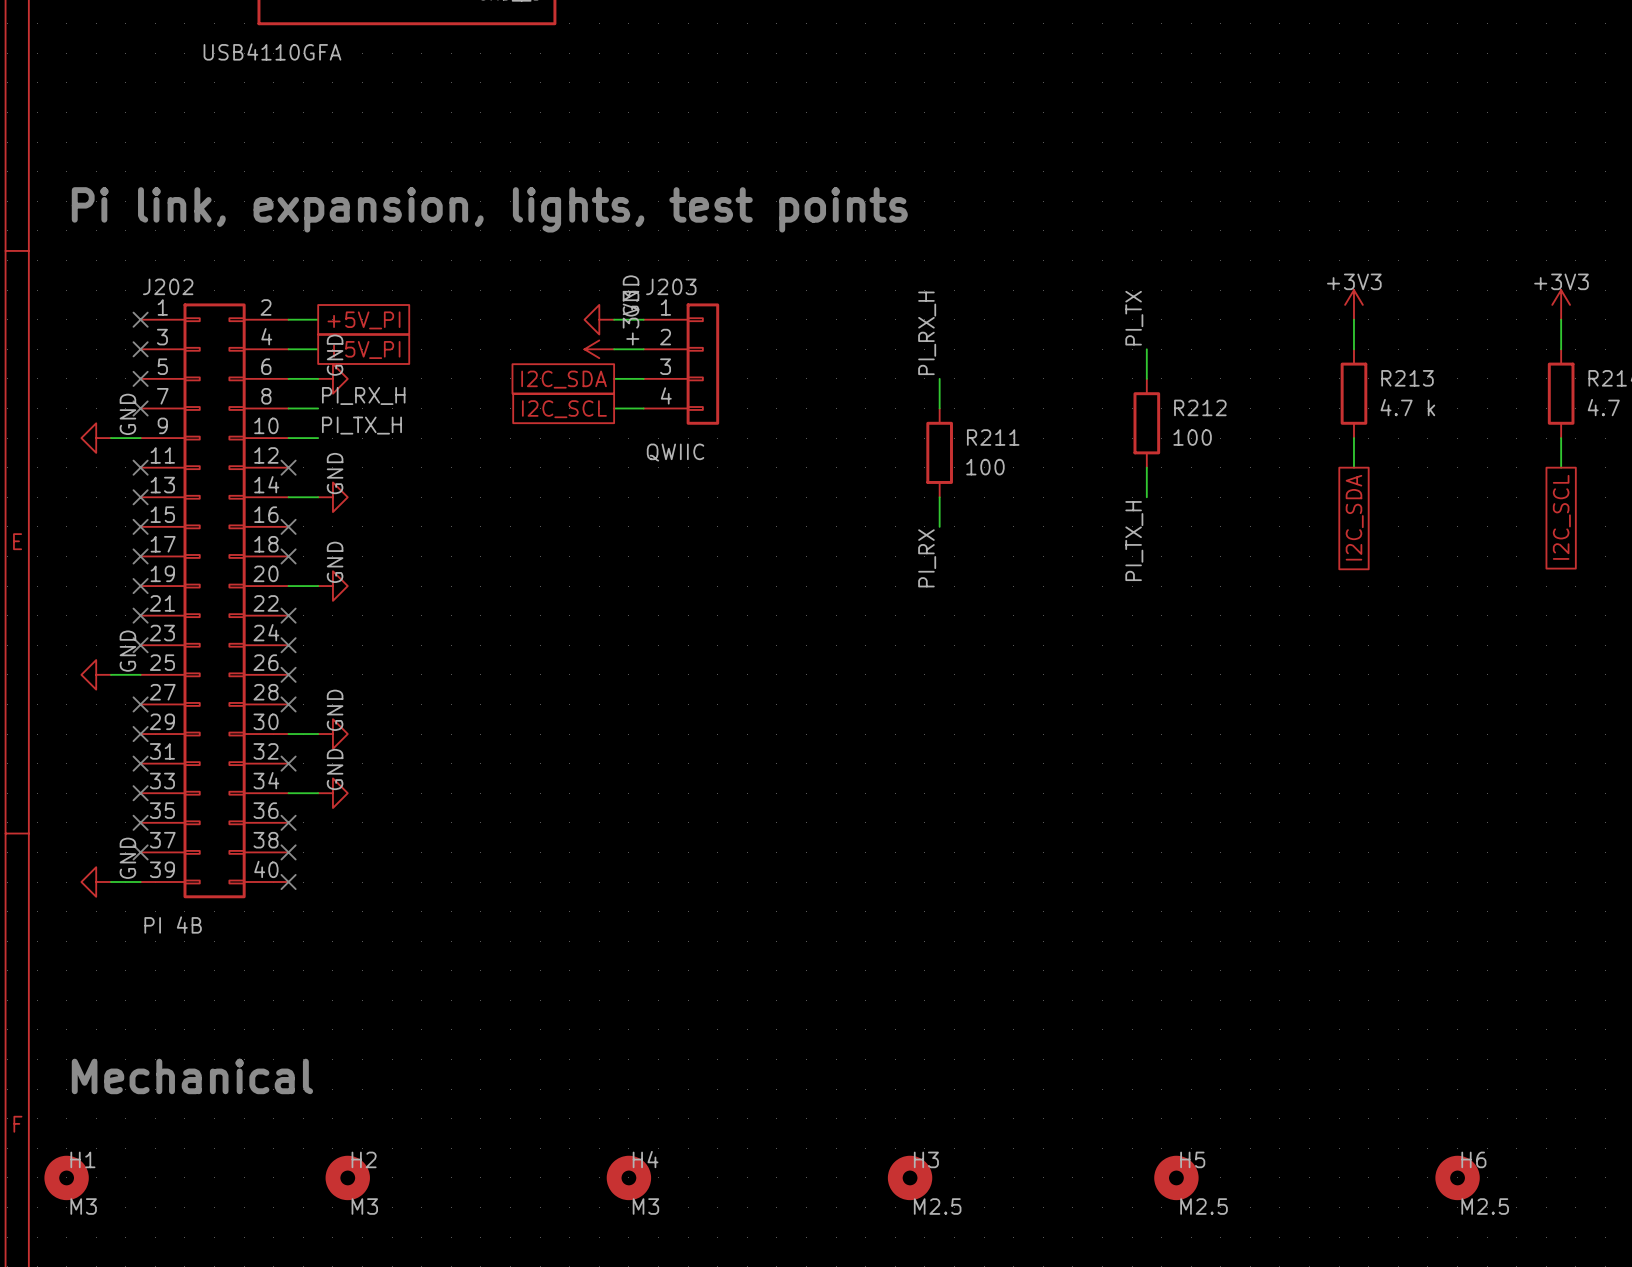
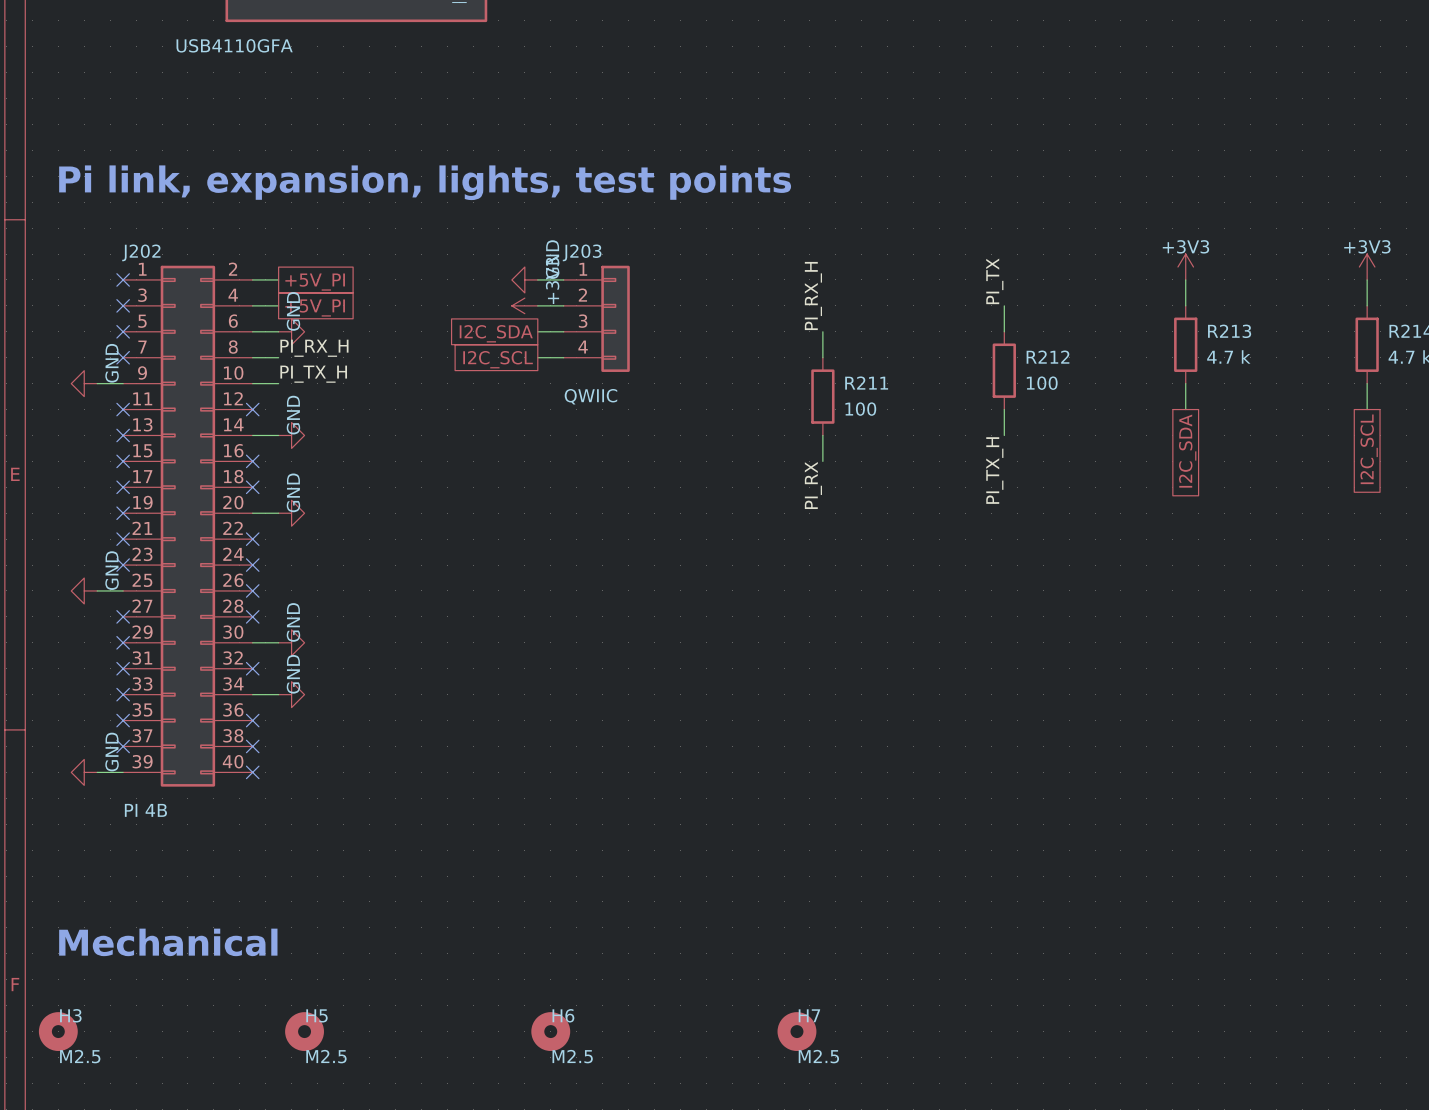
H1 name: H1 (82, 1159) -> H3 (70, 1015)
H2 name: H2 (364, 1159) -> H5 (316, 1015)
H4 name: H4 (645, 1159) -> H6 (563, 1015)
H3 name: H3 (926, 1159) -> H7 (809, 1015)
H5: M2.5 (1176, 1177) -> none
H6: M2.5 (1457, 1177) -> none
H1 value: M3 (83, 1206) -> M2.5 (80, 1056)
H2 value: M3 (364, 1206) -> M2.5 (326, 1056)
H4 value: M3 (645, 1206) -> M2.5 (572, 1056)

